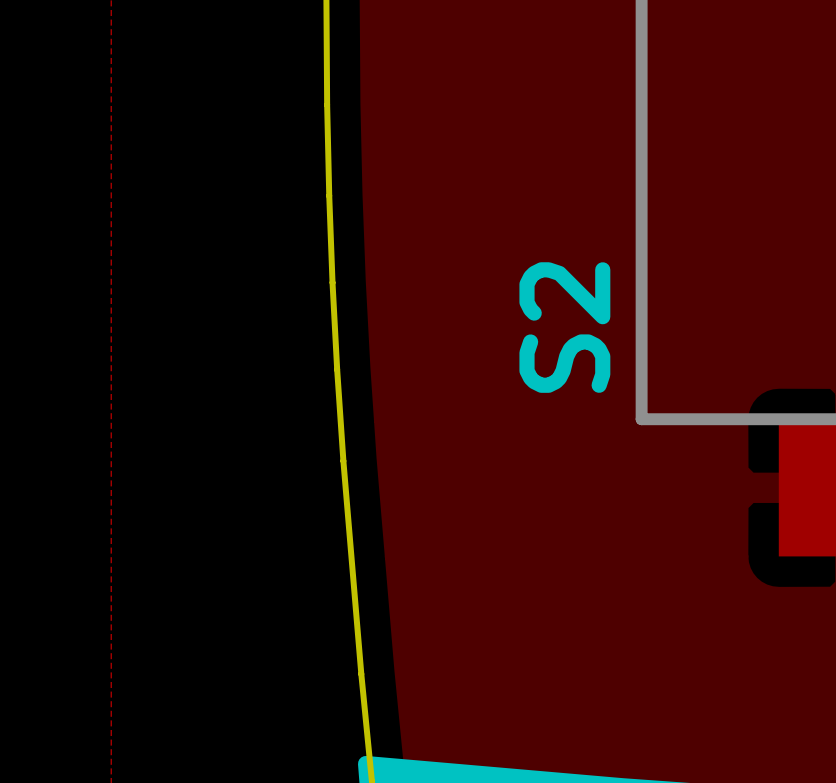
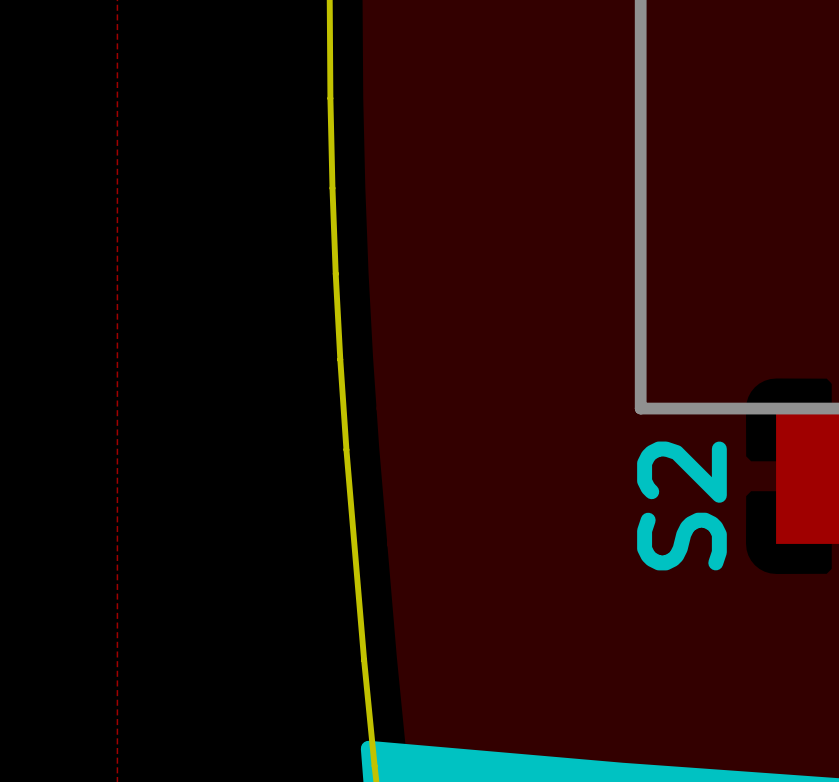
S2 name position: S2 (564, 327) -> S2 (681, 505)

